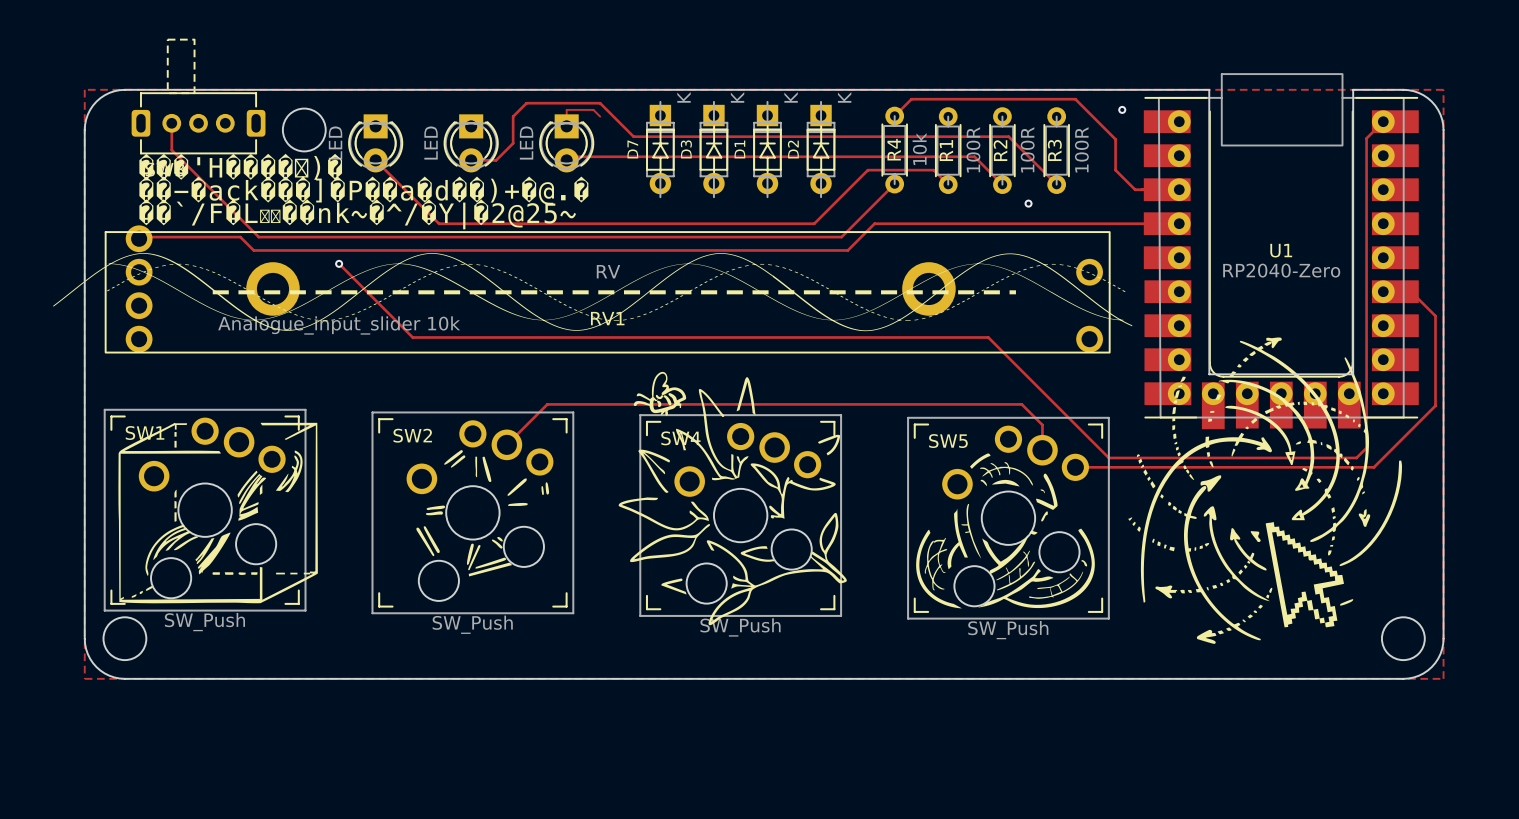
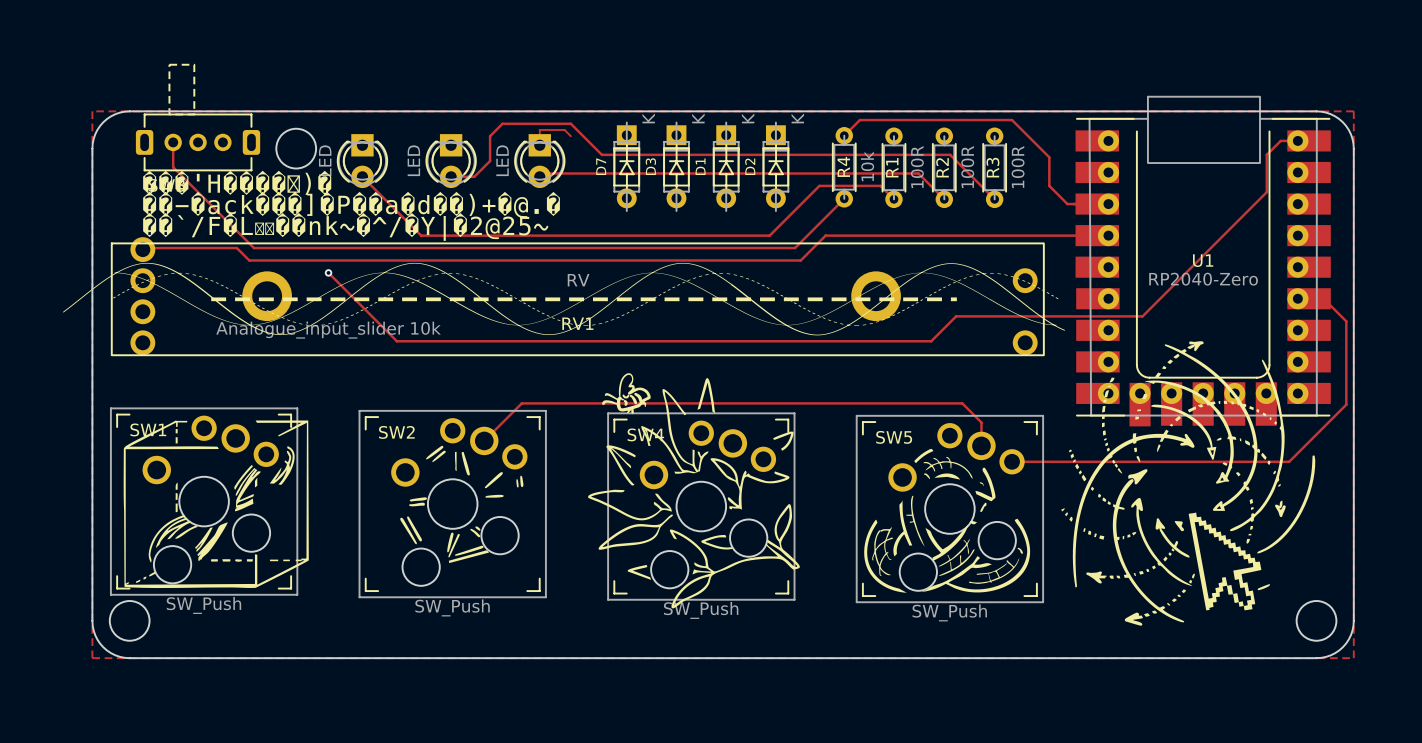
board edge: (1209, 89) (1209, 374) (1353, 374) (1353, 89) -> (1136, 111) (1269, 111)
via: (1122, 109) -> none
track: (1383, 121) (1366, 138) (1366, 447) (1356, 457) (1108, 457) (988, 337) -> (1309, 140) (1280, 140) (1266, 154) (1266, 192) (1142, 316) (956, 316) (931, 341)
via: (1028, 203) -> none

